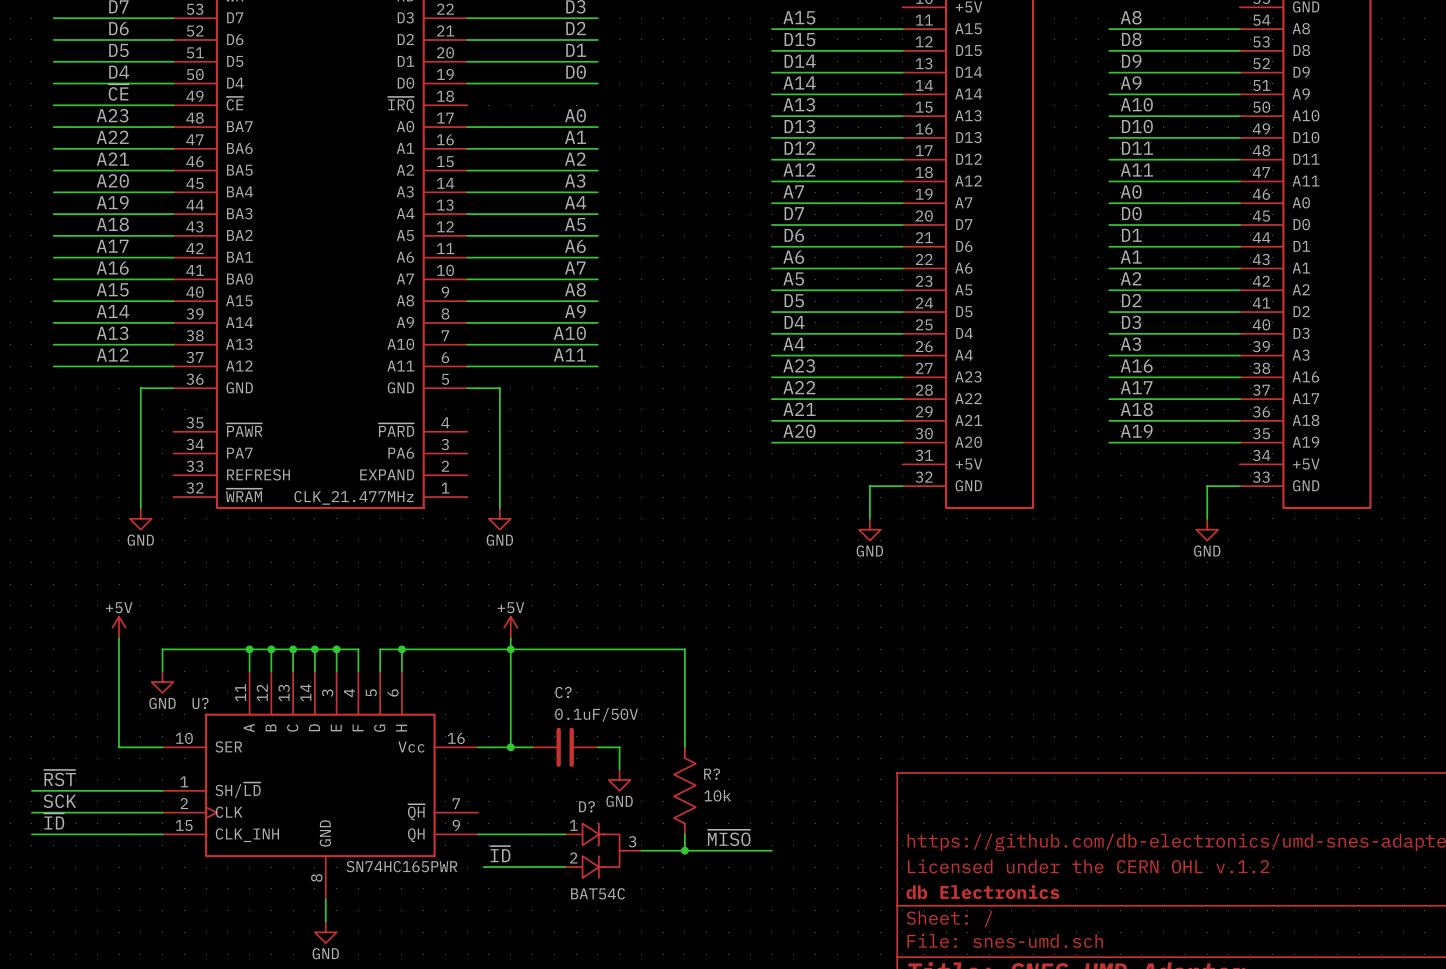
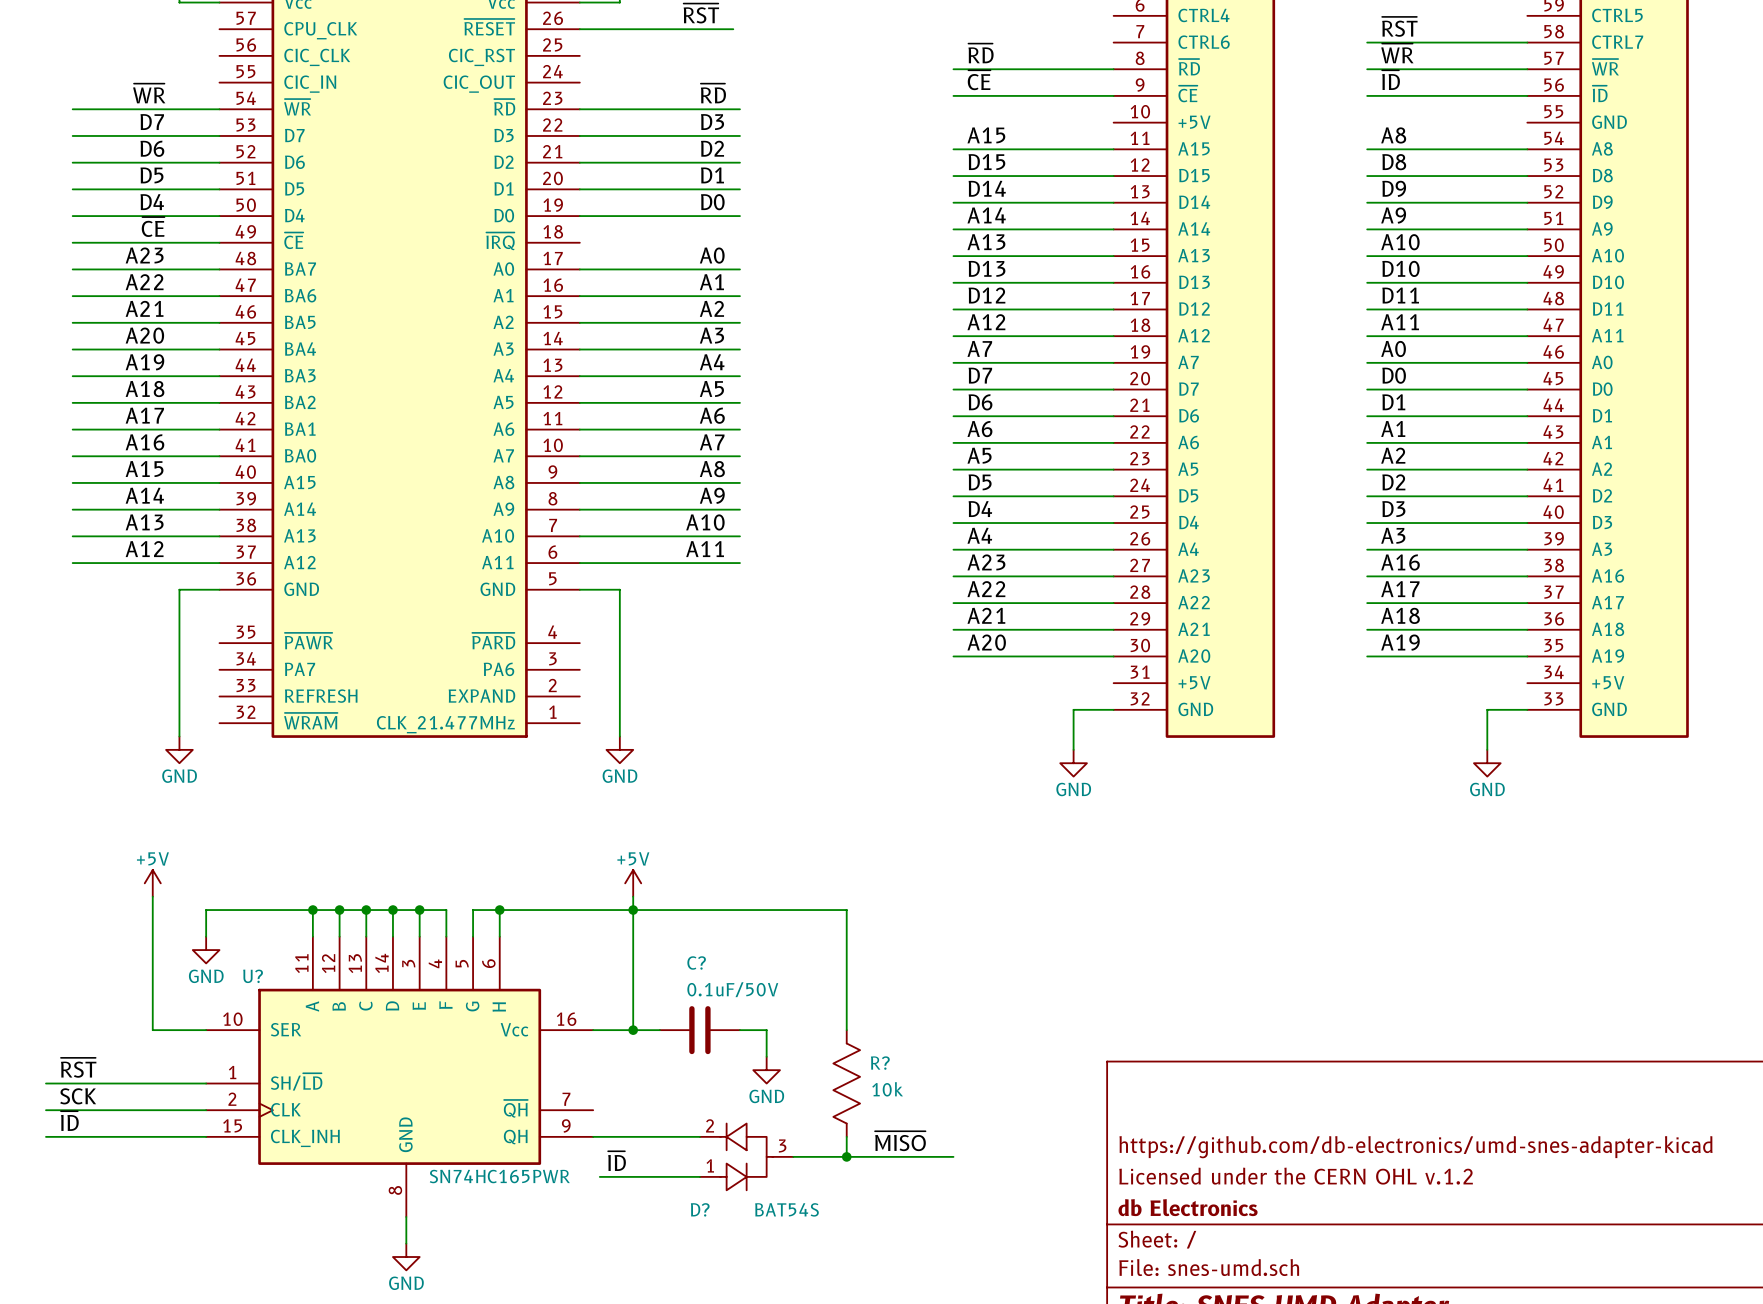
D? name position: D? (586, 806) -> D? (700, 1209)
D? symbol: [565, 823, 642, 878] -> [699, 1123, 794, 1191]
D? value: BAT54C (598, 893) -> BAT54S (786, 1209)

